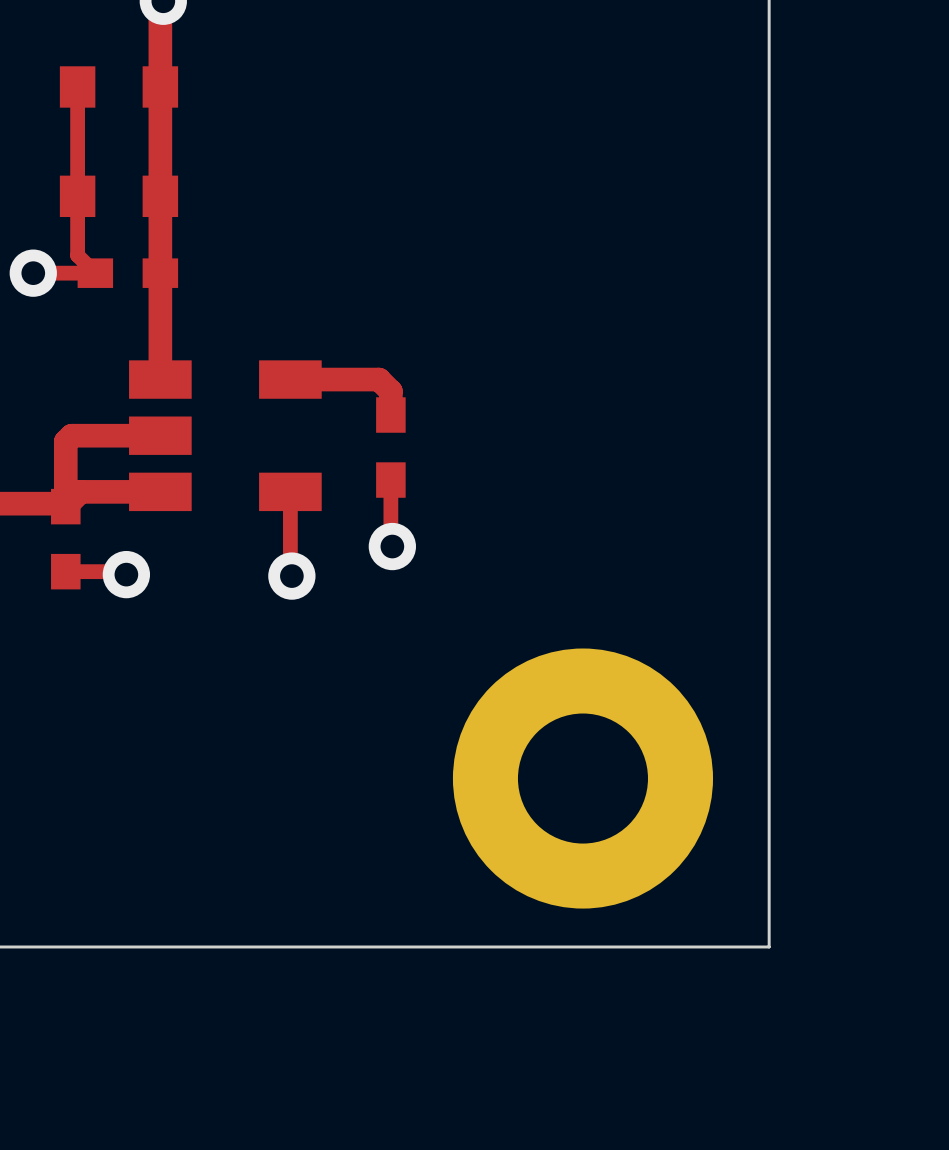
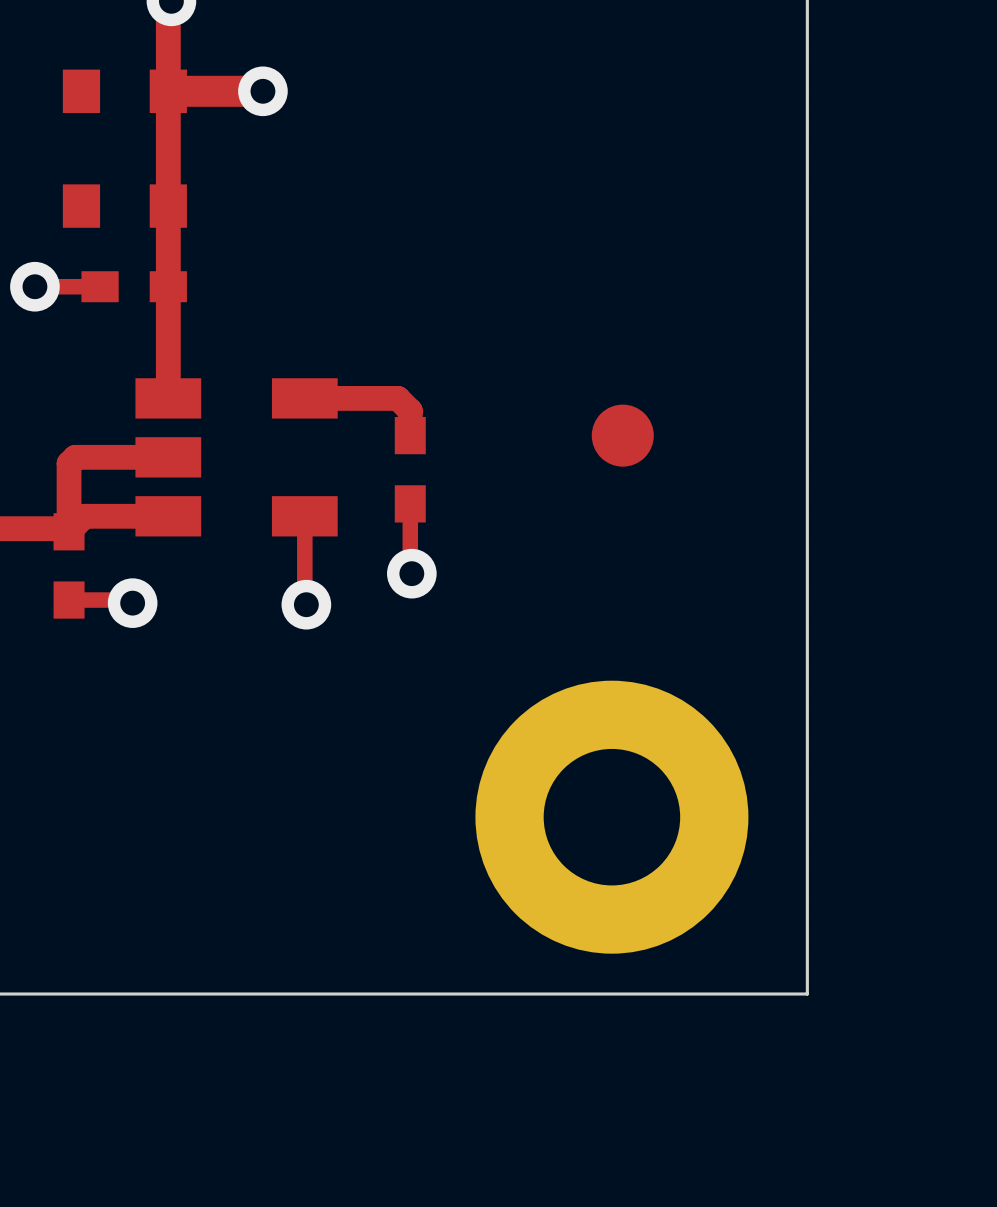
top track: (77, 86) (77, 255) (95, 273) -> none
top track: none -> (262, 91) (168, 91)
via: none -> (262, 91)
part: none -> (622, 435)

